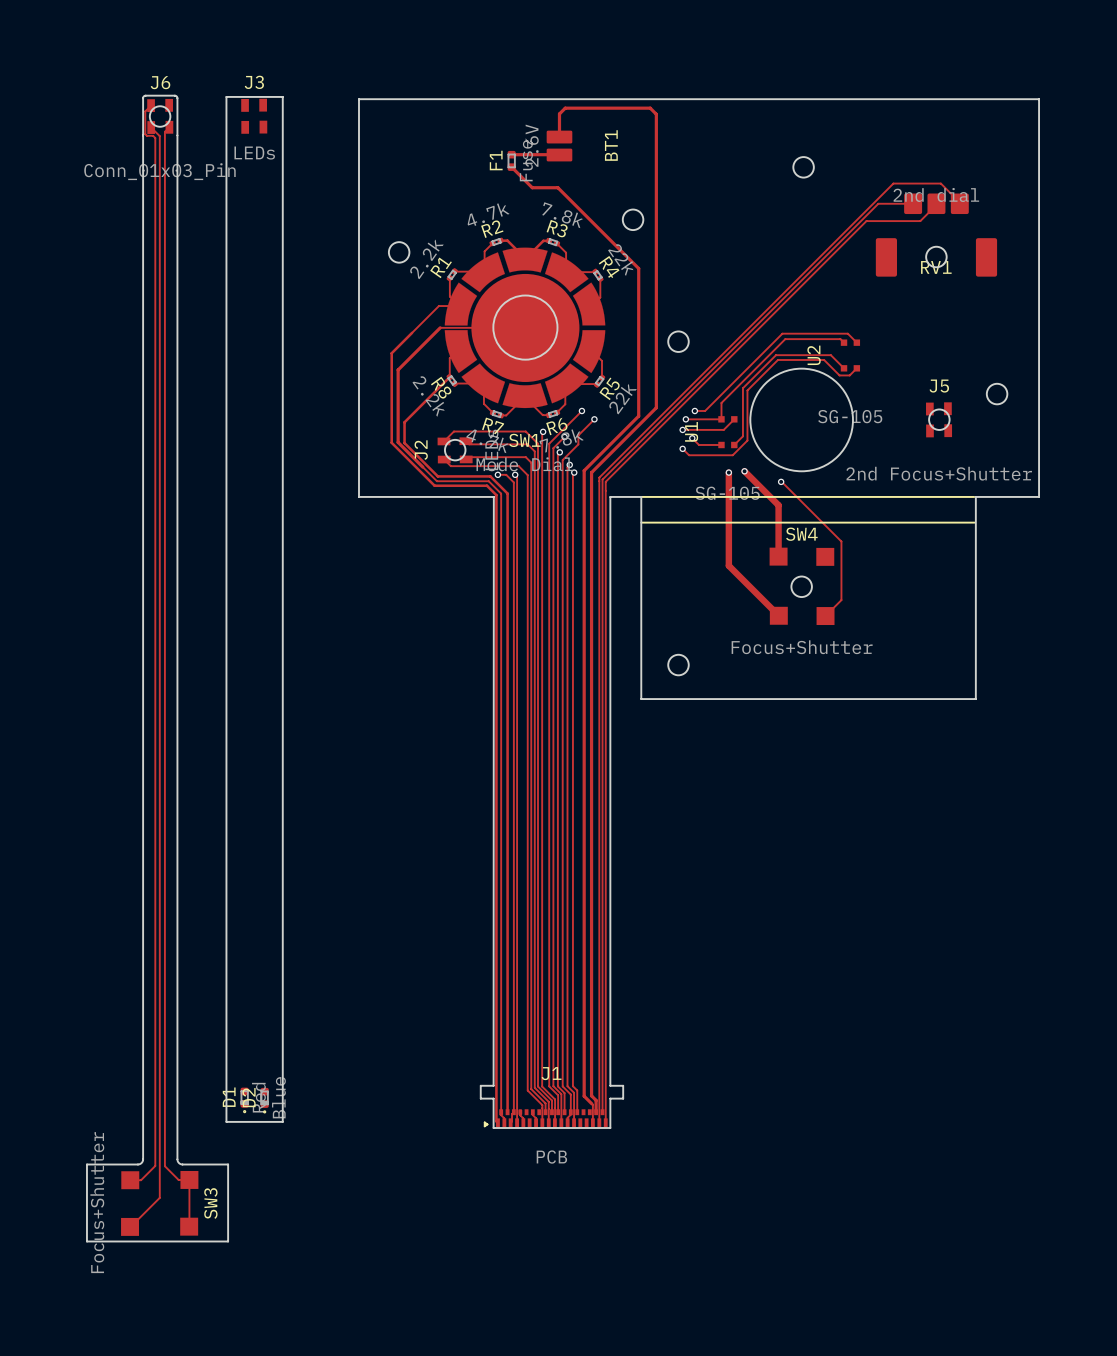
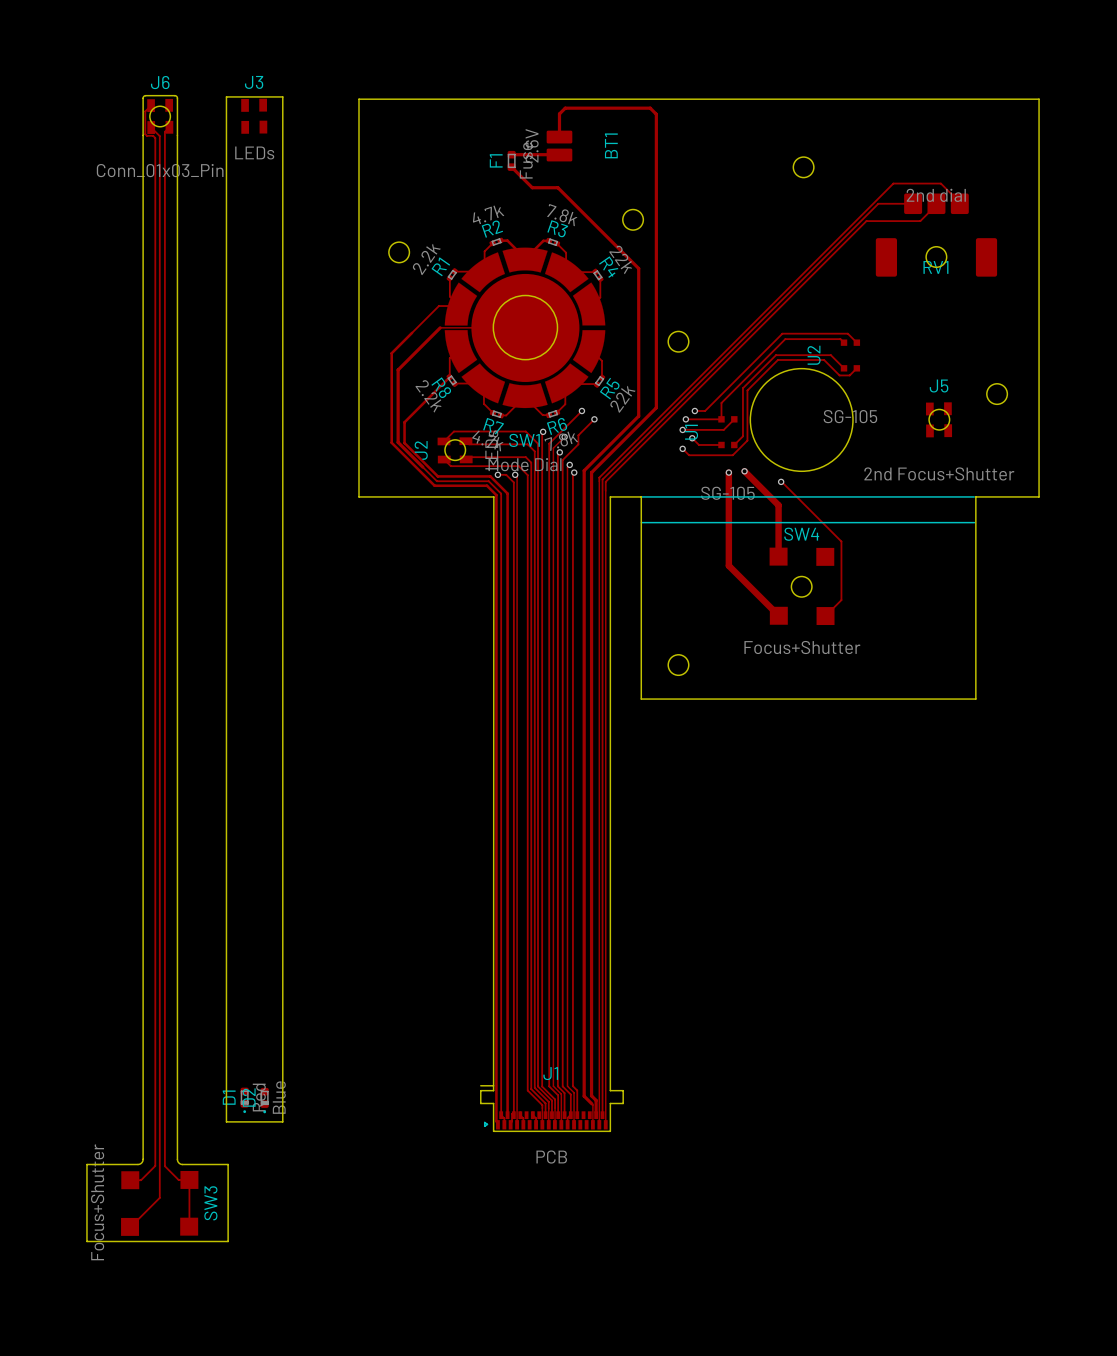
J1 footprint: [480, 1085, 624, 1129] -> [480, 1090, 624, 1132]
board edge: (610, 1085) (623, 1085) -> (610, 1085) (610, 1090)

